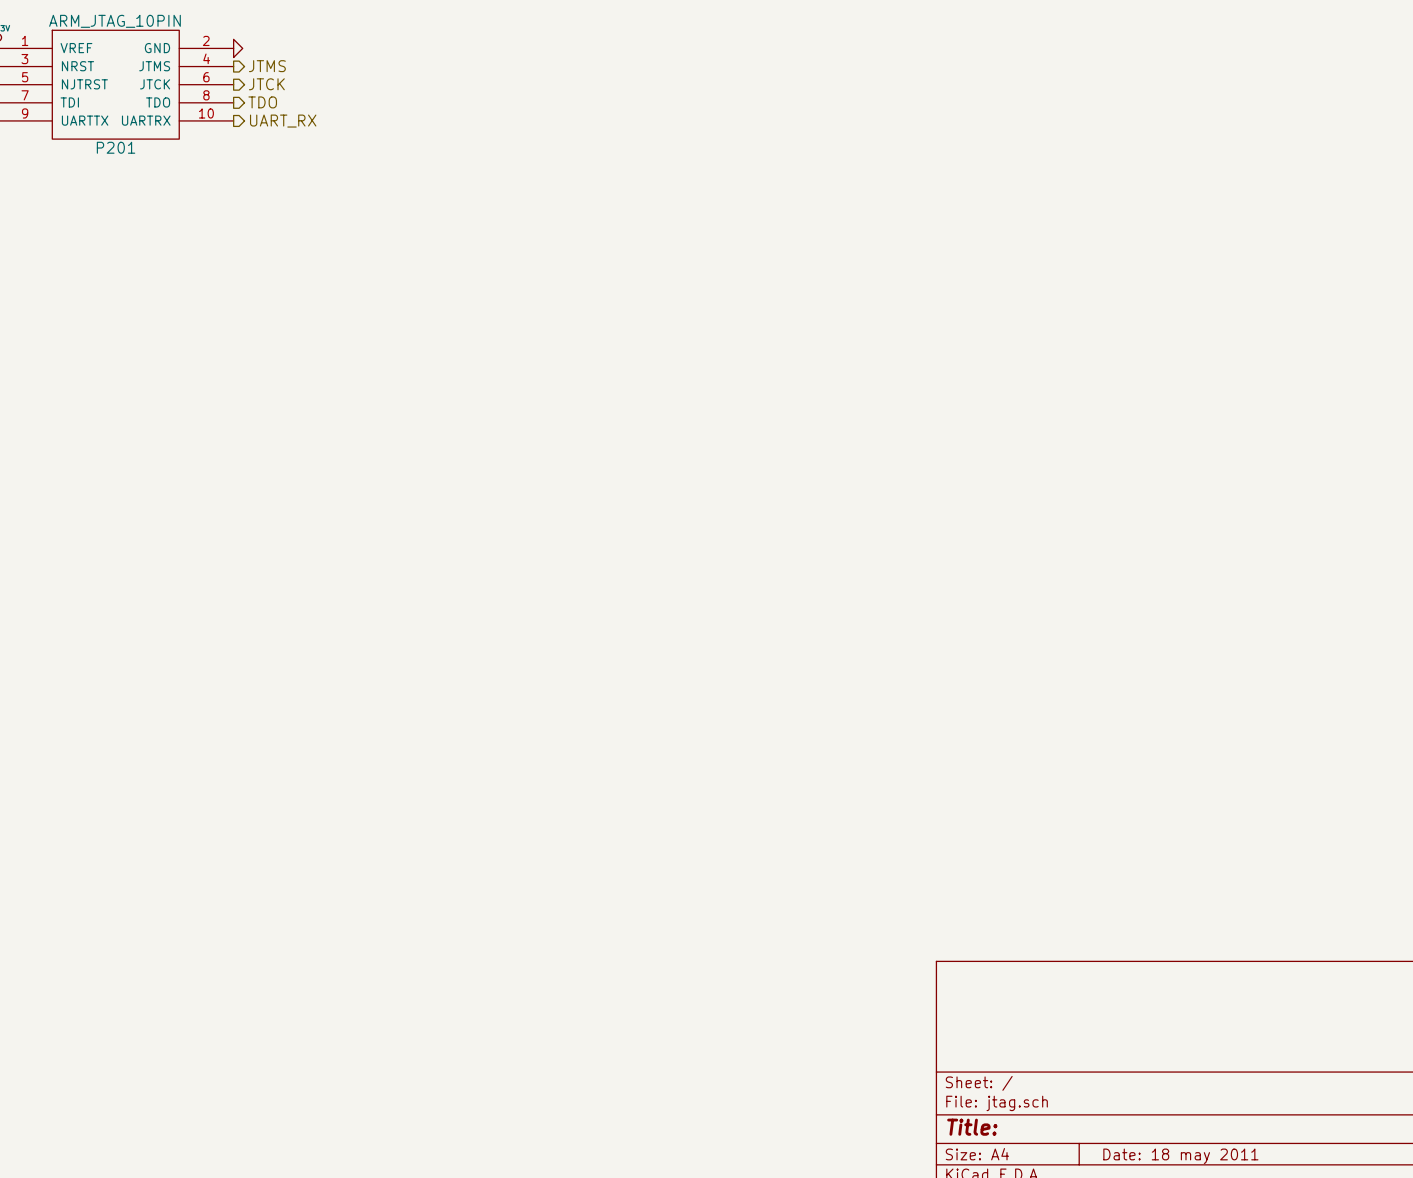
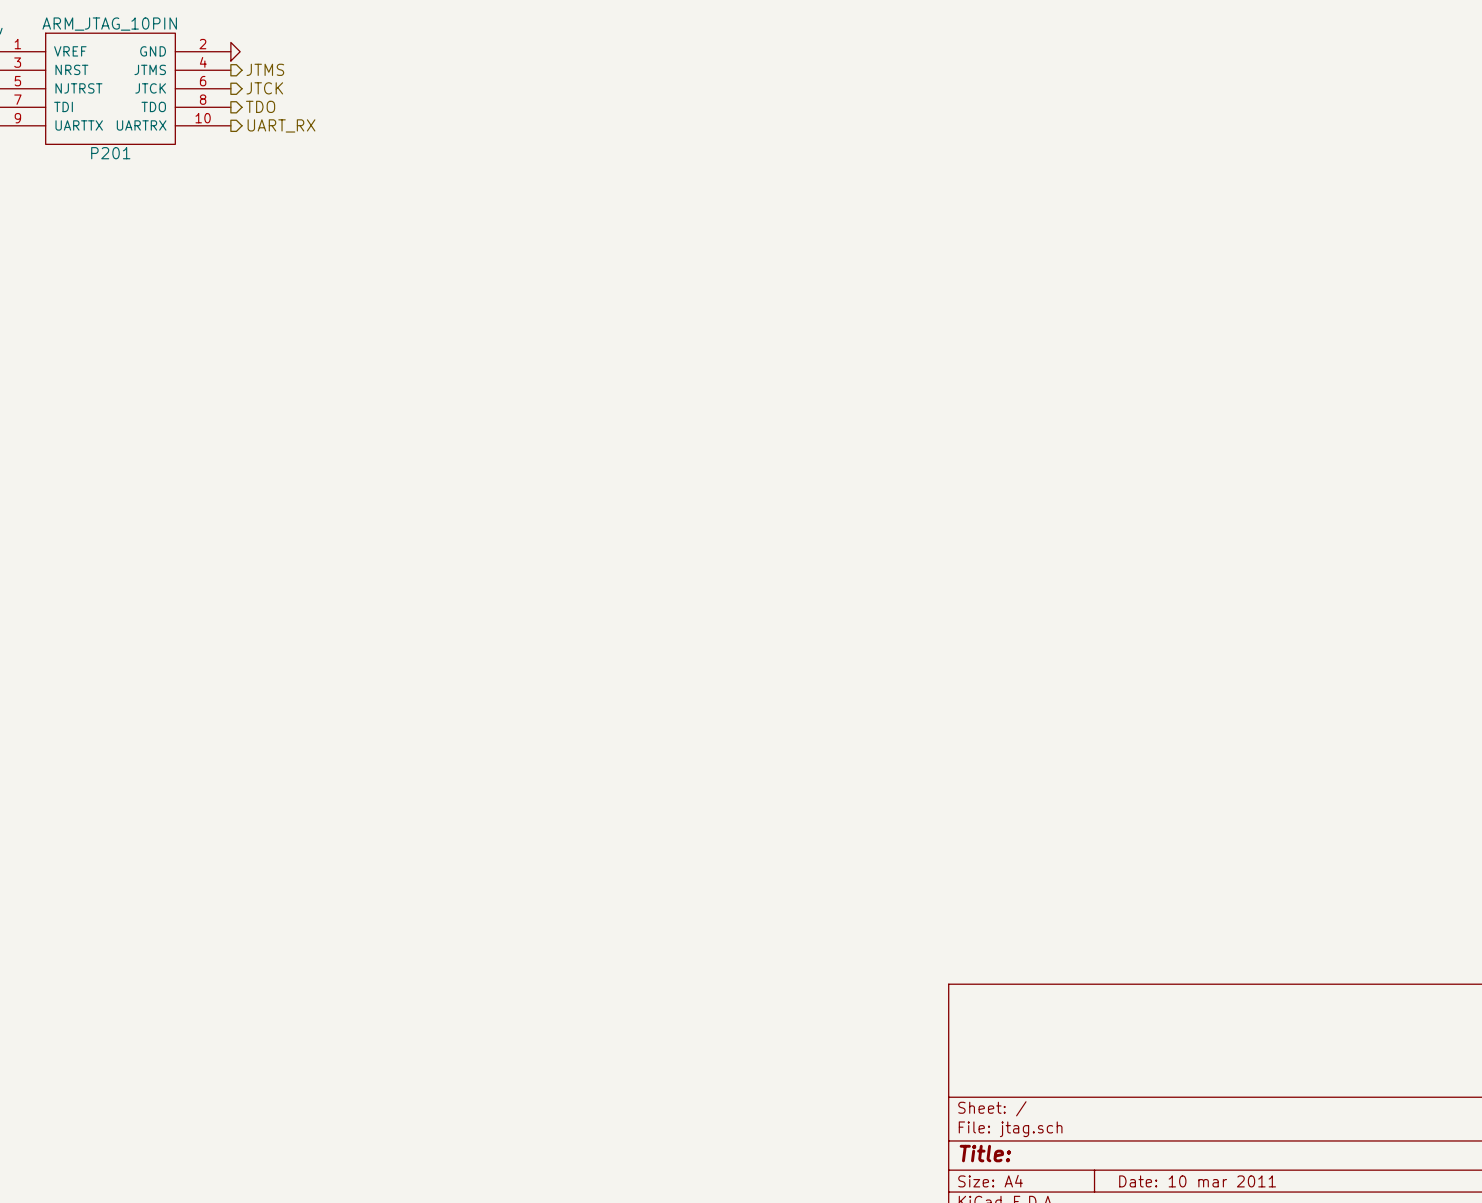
title block: Date: 18 may 2011 (1180, 1156) -> Date: 10 mar 2011 (1197, 1181)

